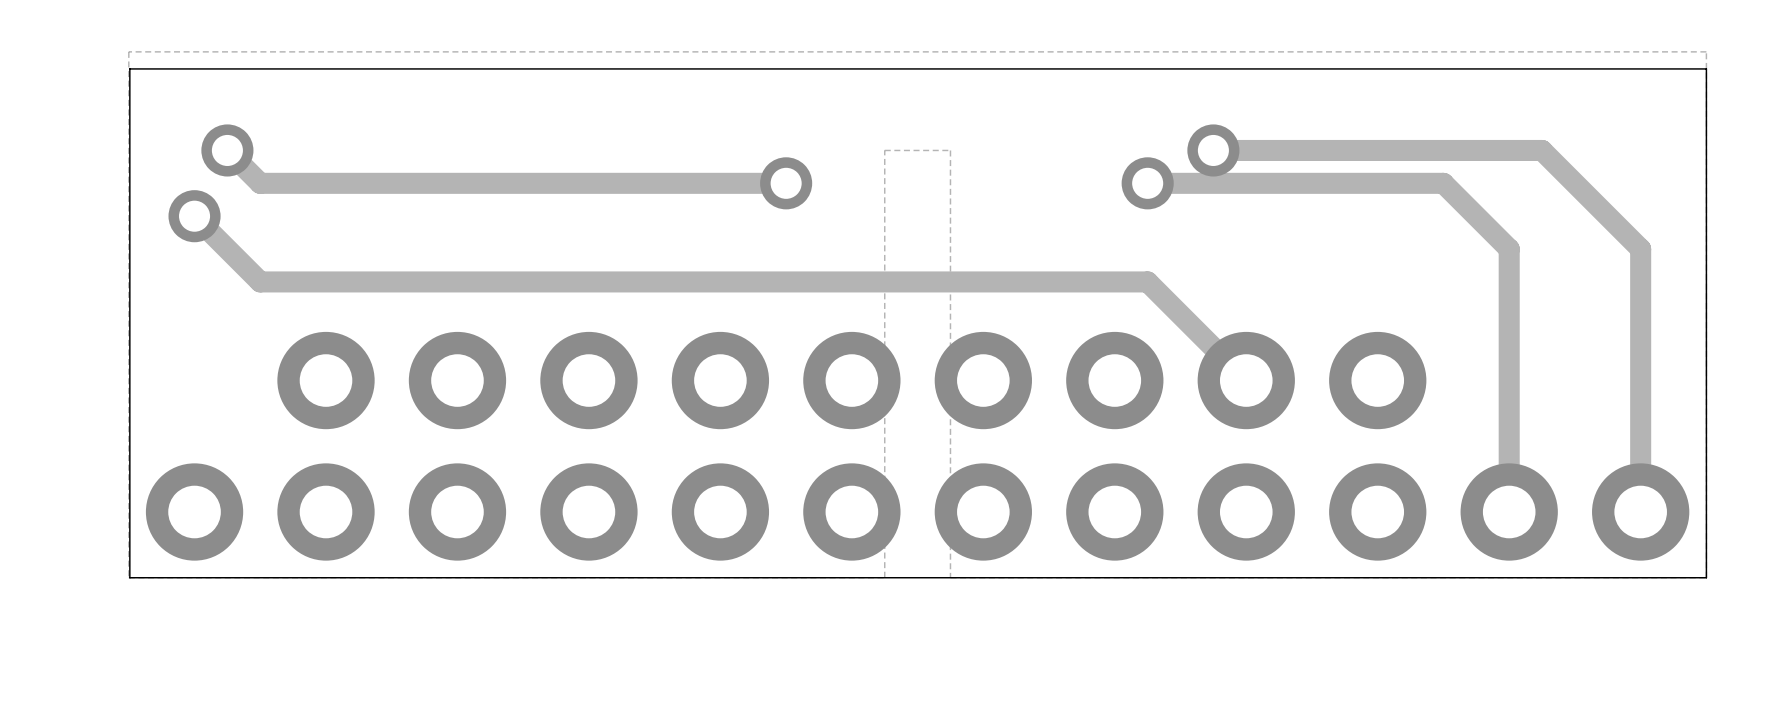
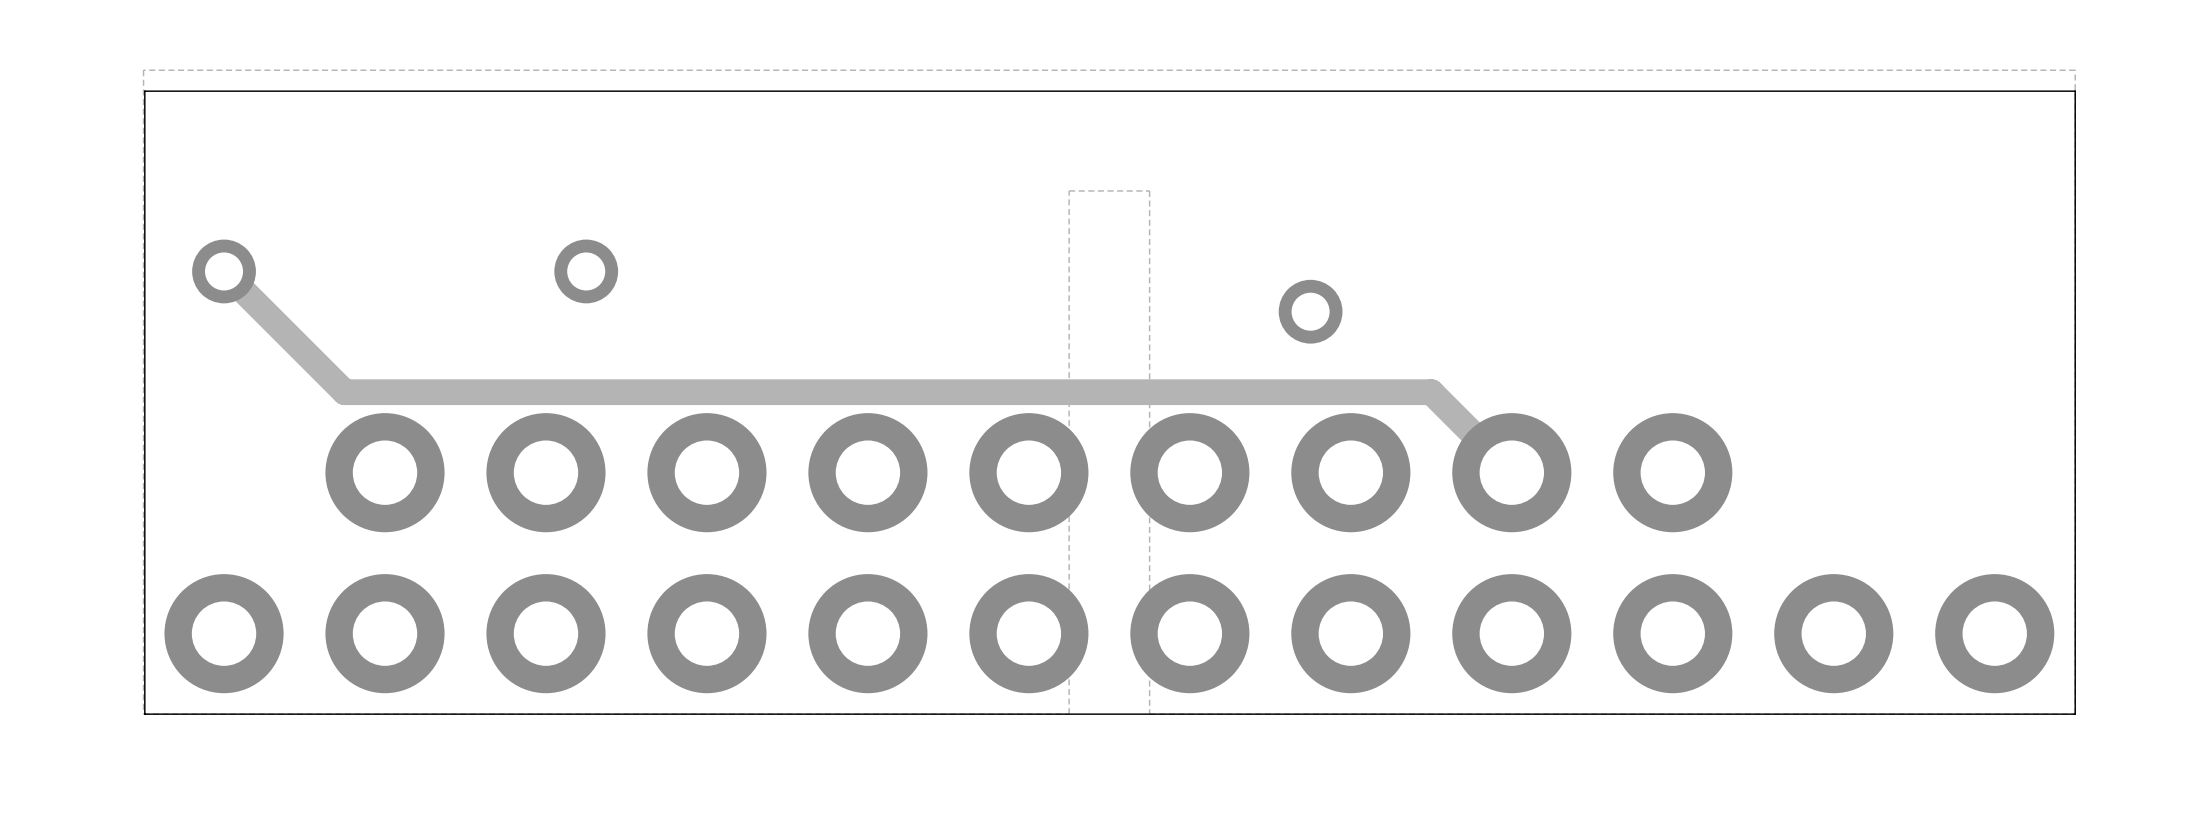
track: (227, 150) (260, 183) (786, 183) -> none
via: (227, 150) -> none
track: (1213, 150) (1542, 150) (1640, 249) (1640, 512) -> none
via: (1213, 150) -> none
via: (786, 183) -> none
track: (1147, 183) (1443, 183) (1509, 249) (1509, 512) -> none
via: (1147, 183) -> none
via: none -> (586, 271)
via: none -> (1310, 311)
track: (260, 281) (1147, 281) (1180, 314) -> (304, 351) (344, 392) (1431, 392)

